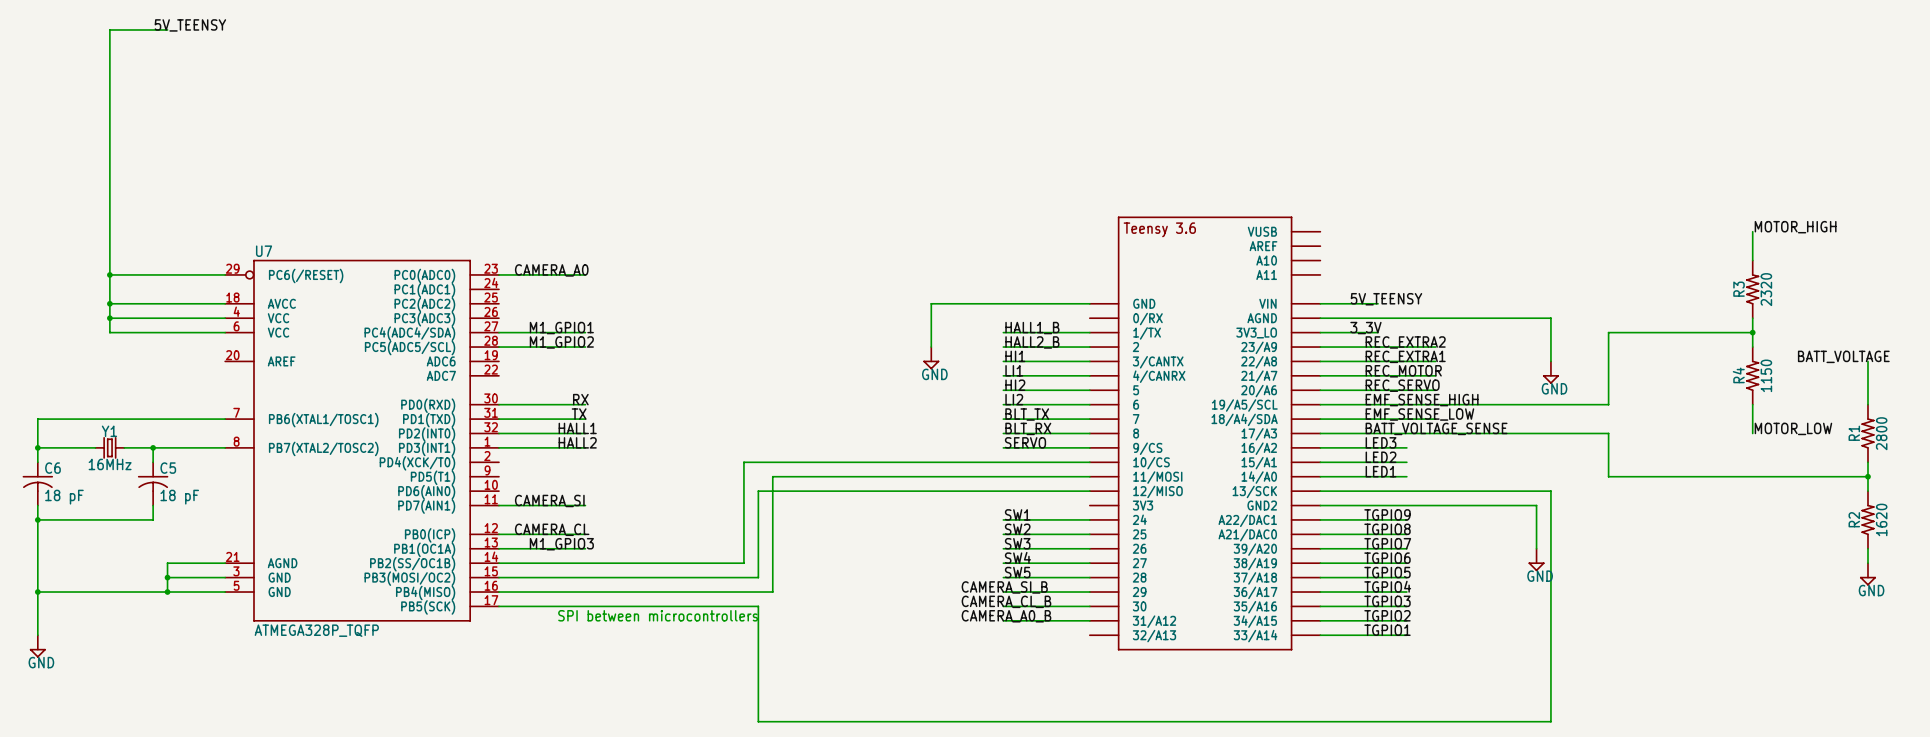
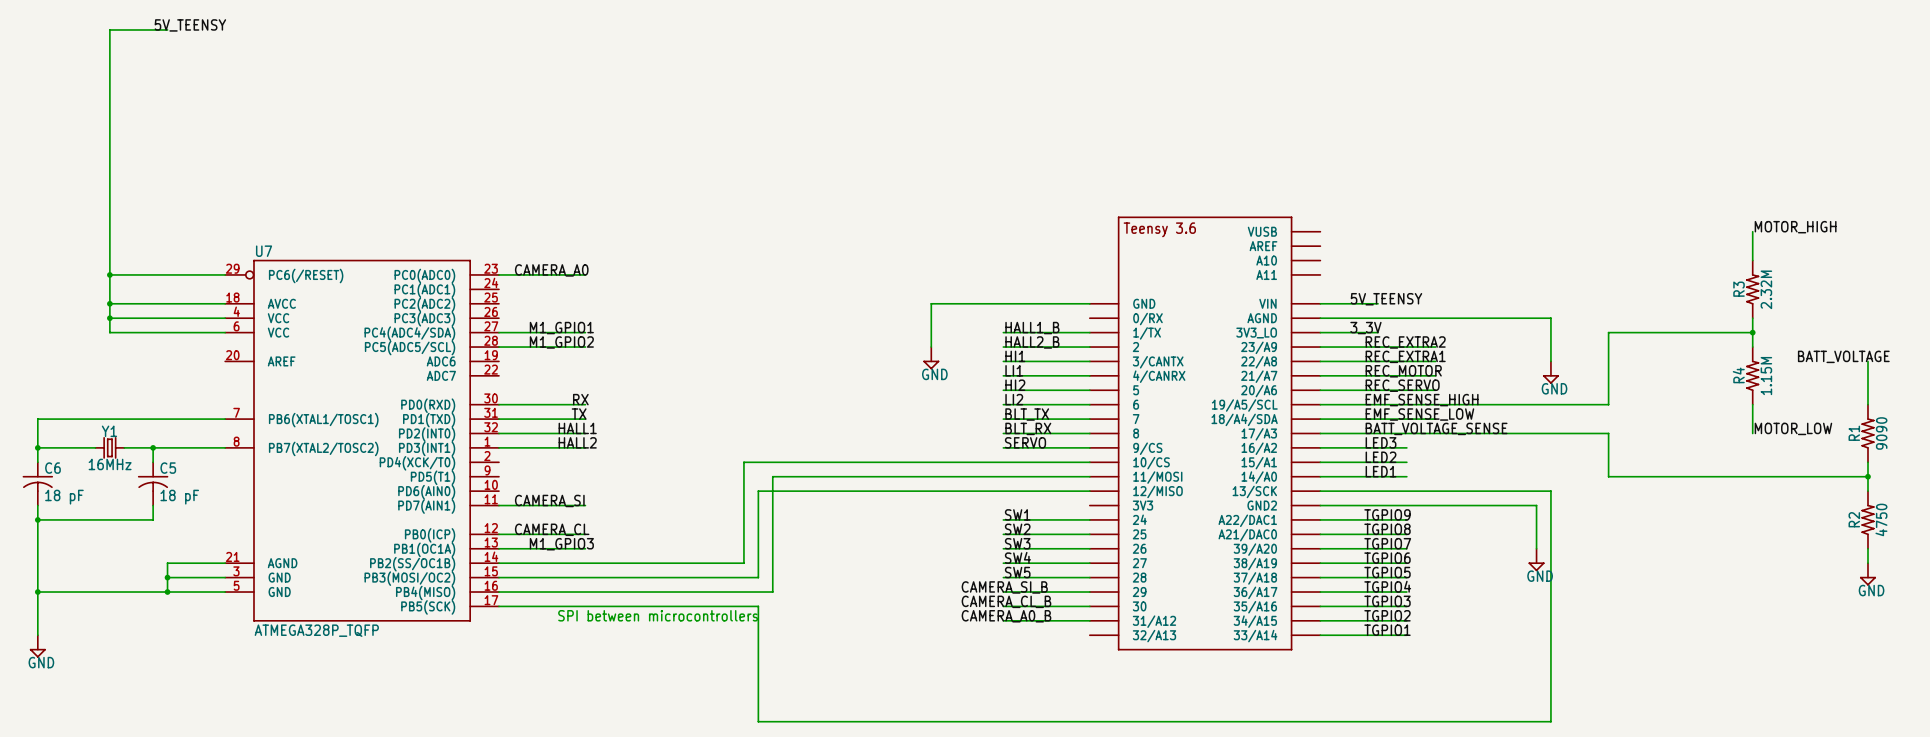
R3 value: 2320 (1766, 289) -> 2.32M (1766, 289)
R4 value: 1150 (1766, 375) -> 1.15M (1766, 376)
R1 value: 2800 (1881, 433) -> 9090 (1881, 433)
R2 value: 1620 (1881, 519) -> 4750 (1881, 519)

